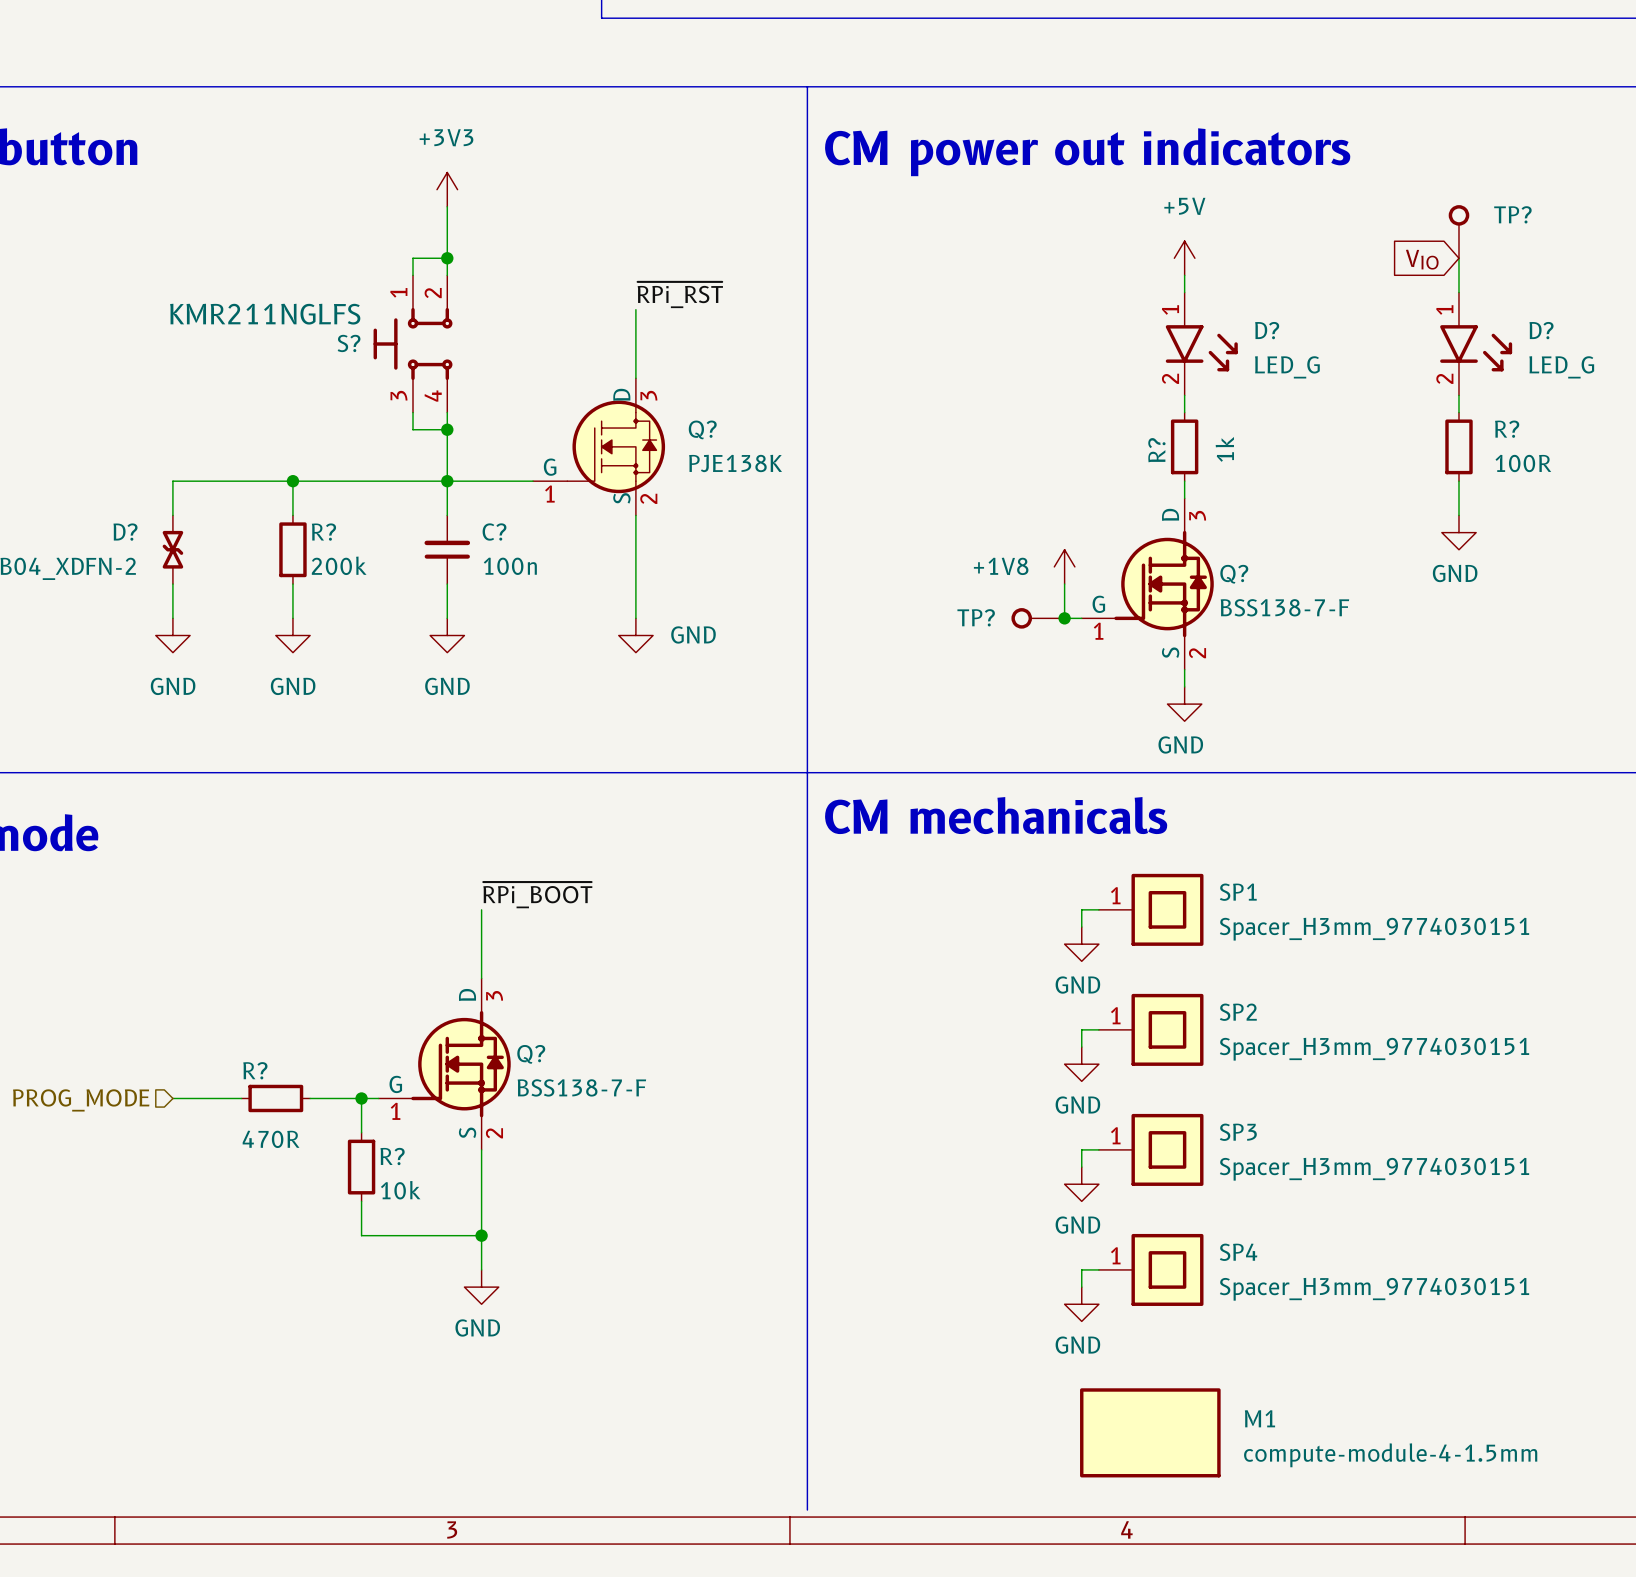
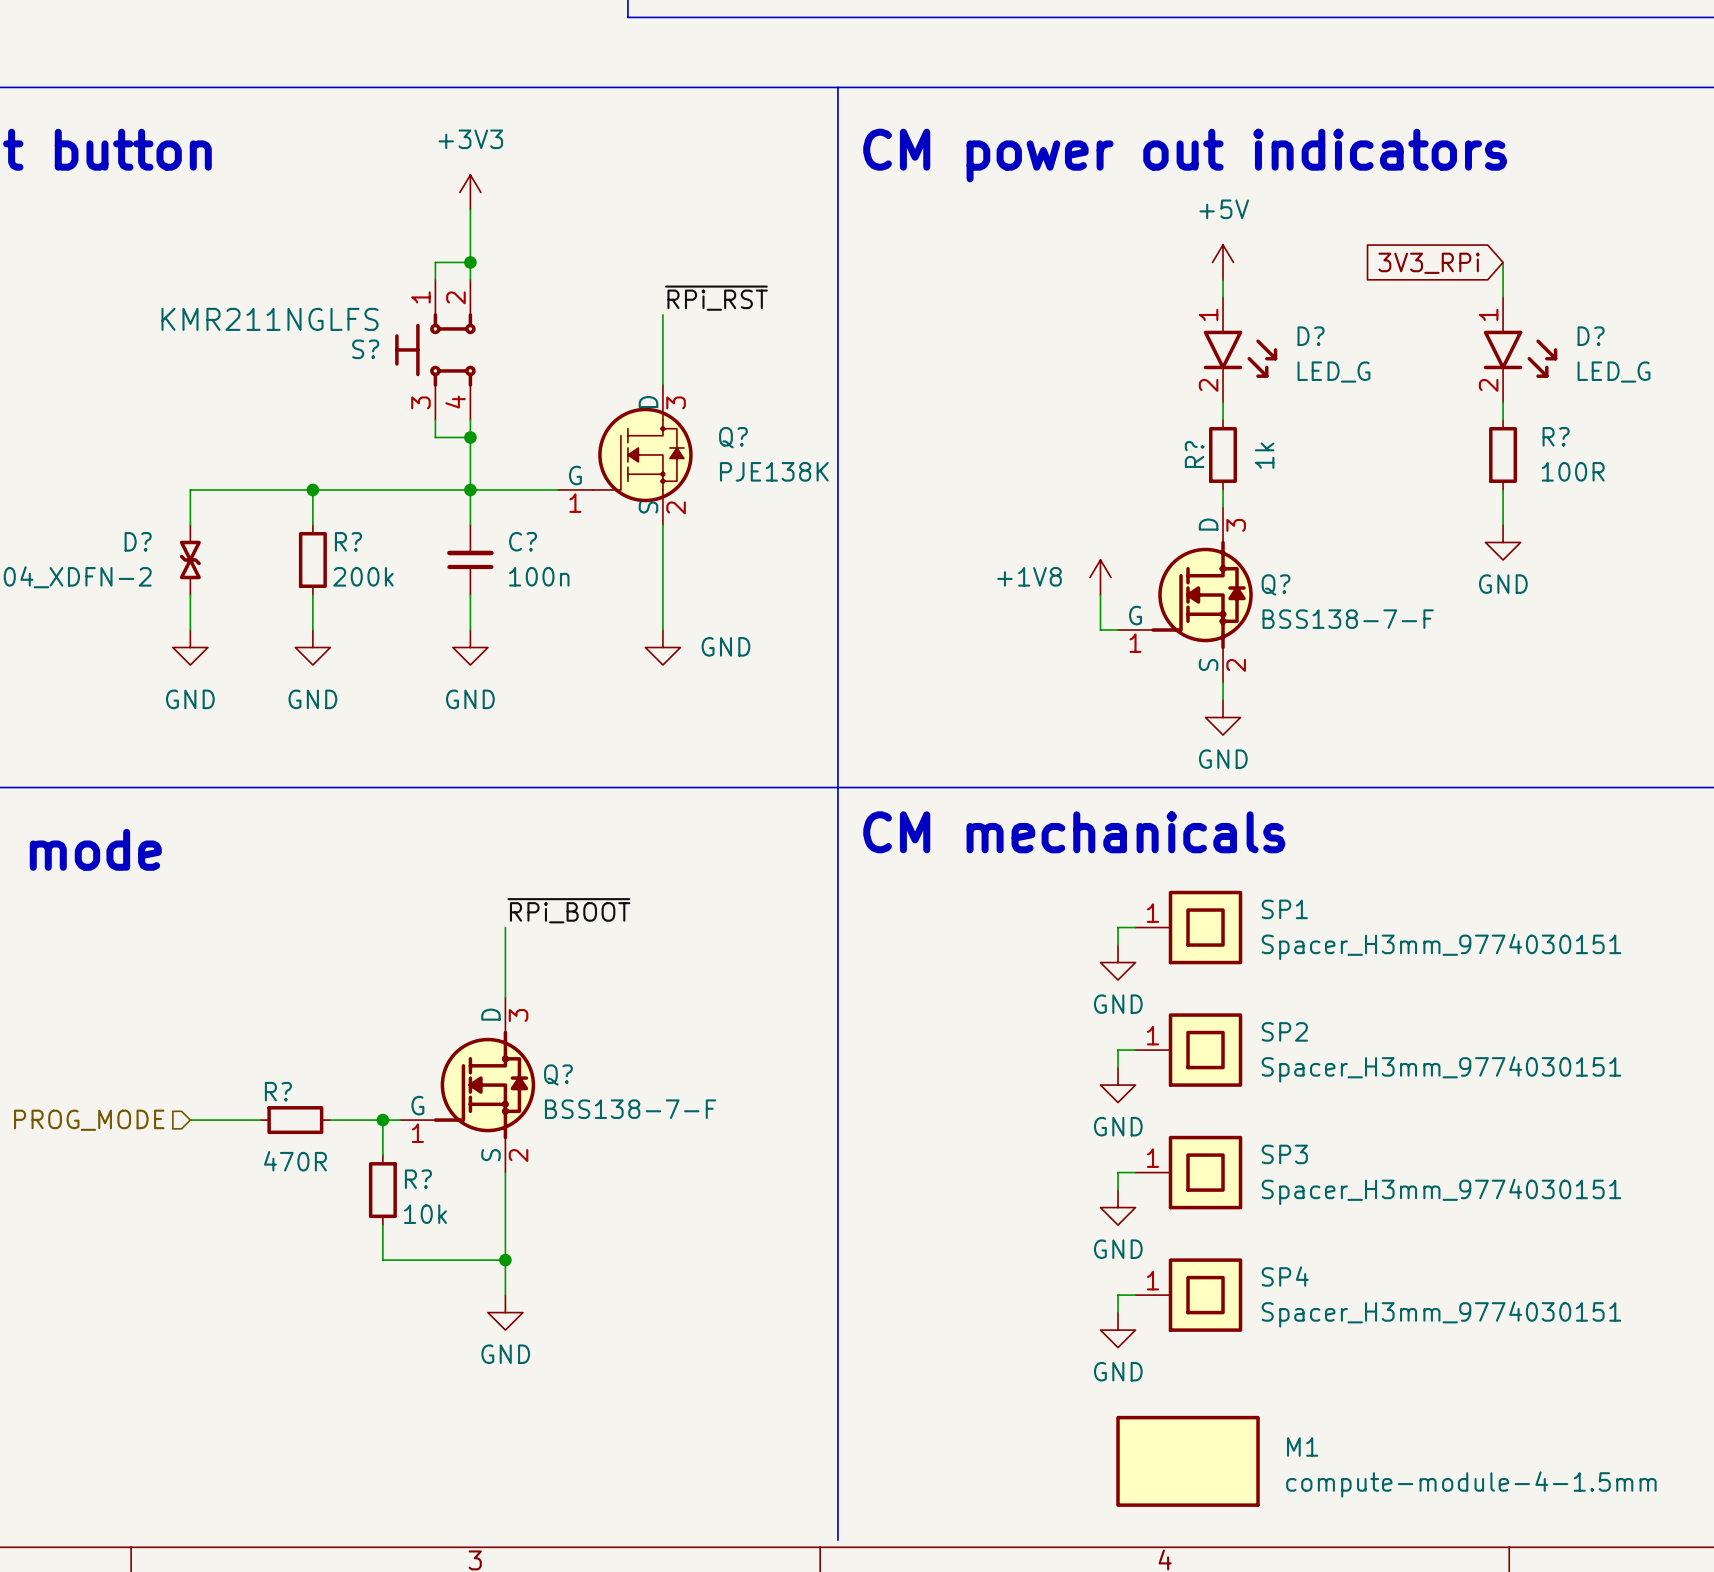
TP?: (1458, 231) -> none
global label: VIO (1422, 259) -> 3V3_RPi (1429, 263)
TP?: (1038, 618) -> none
junction: (1064, 618) -> none

